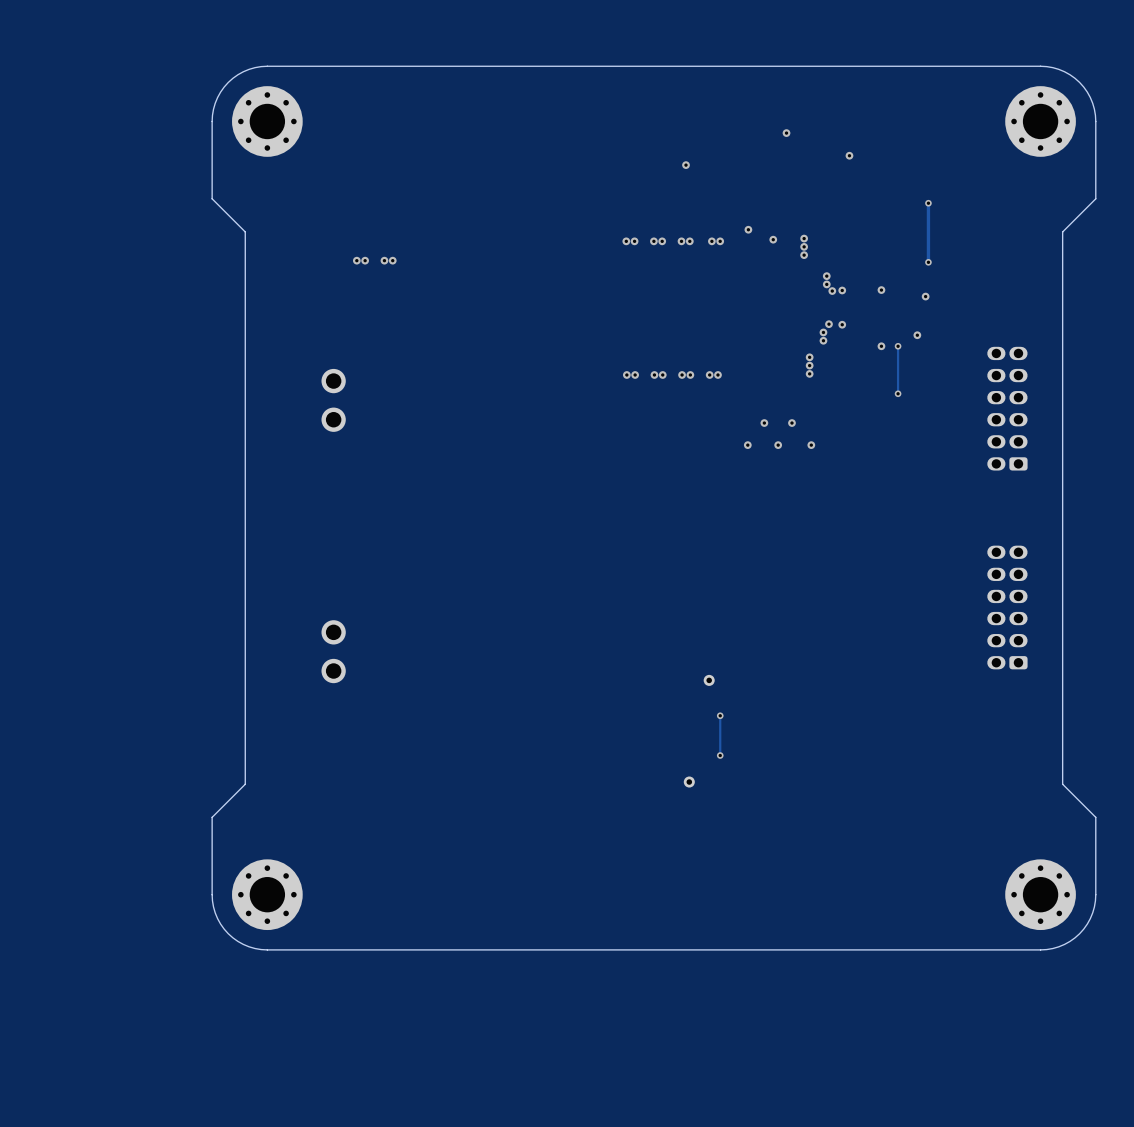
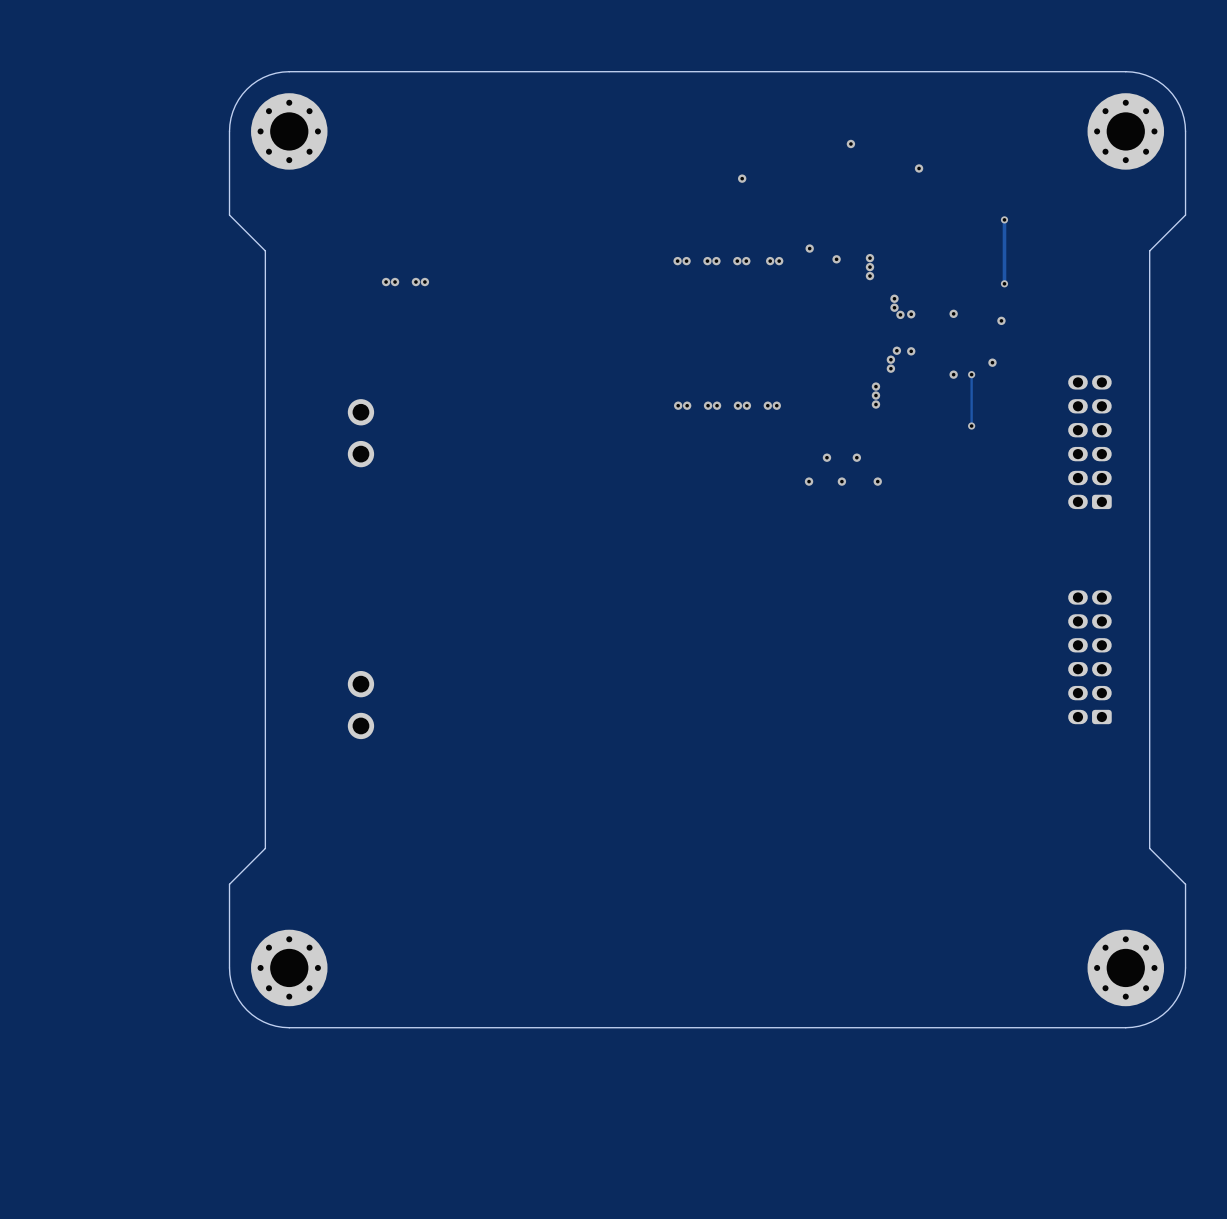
part: (709, 680) -> none
track: (720, 715) (720, 755) -> none
via: (720, 715) -> none
via: (720, 755) -> none
part: (689, 782) -> none

